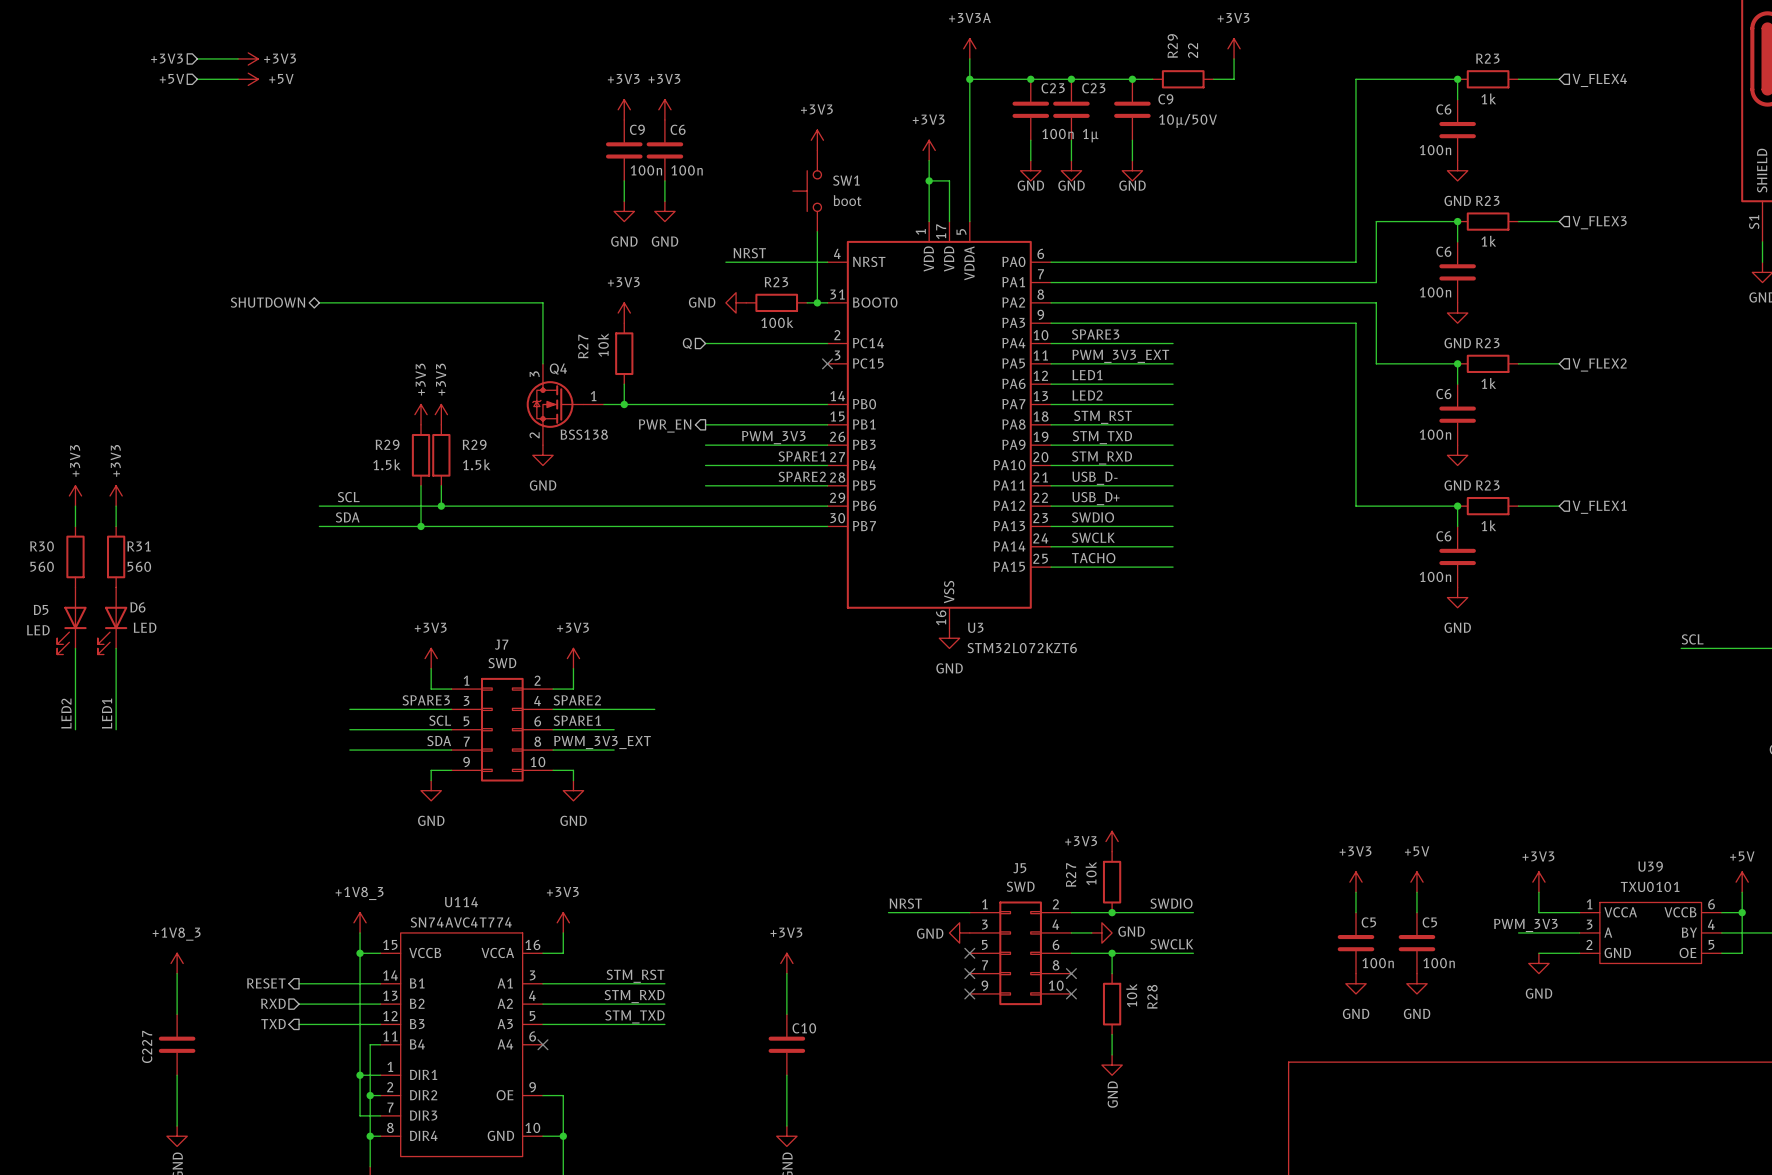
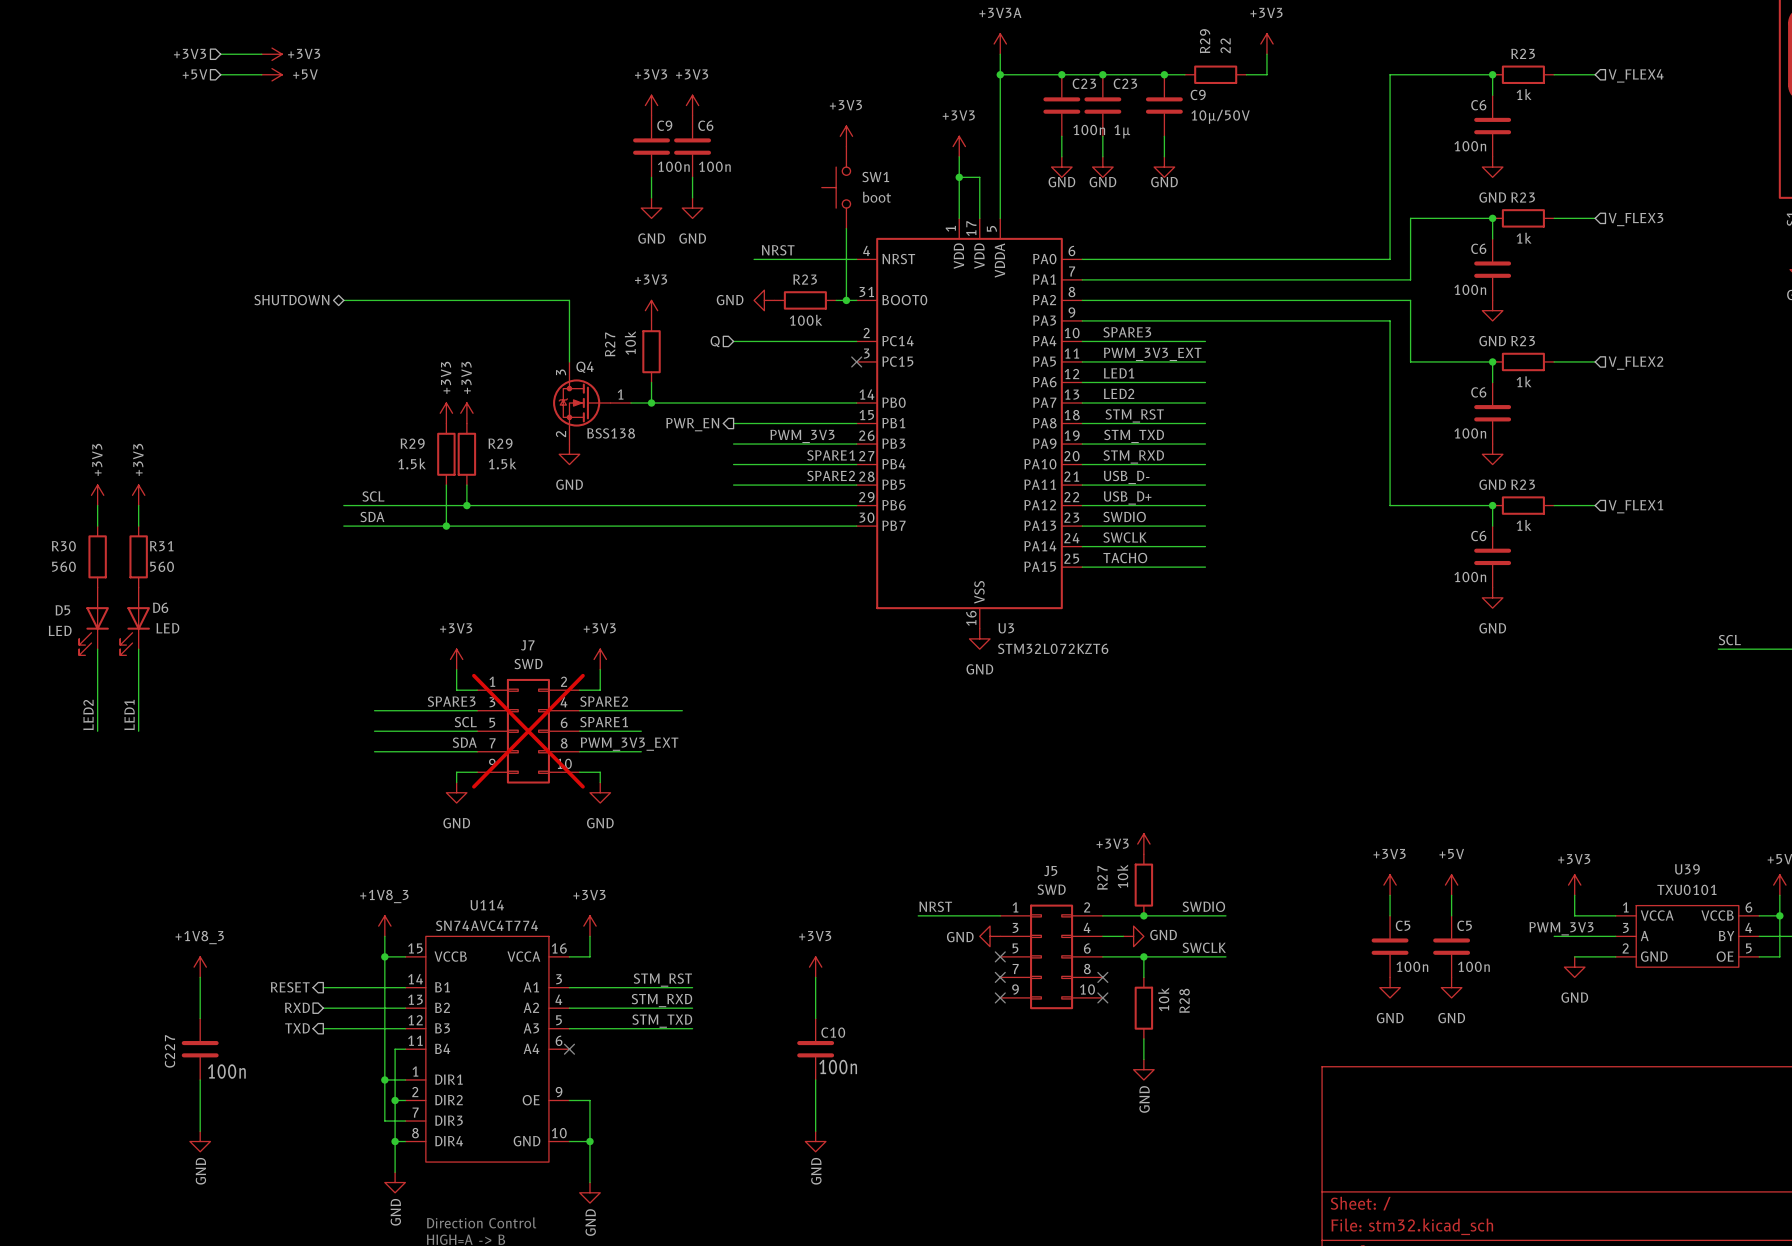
J7 do-not-place cross: none -> (528, 731)
C10 value: none -> 100n (838, 1067)
C227 value: none -> 100n (226, 1071)

